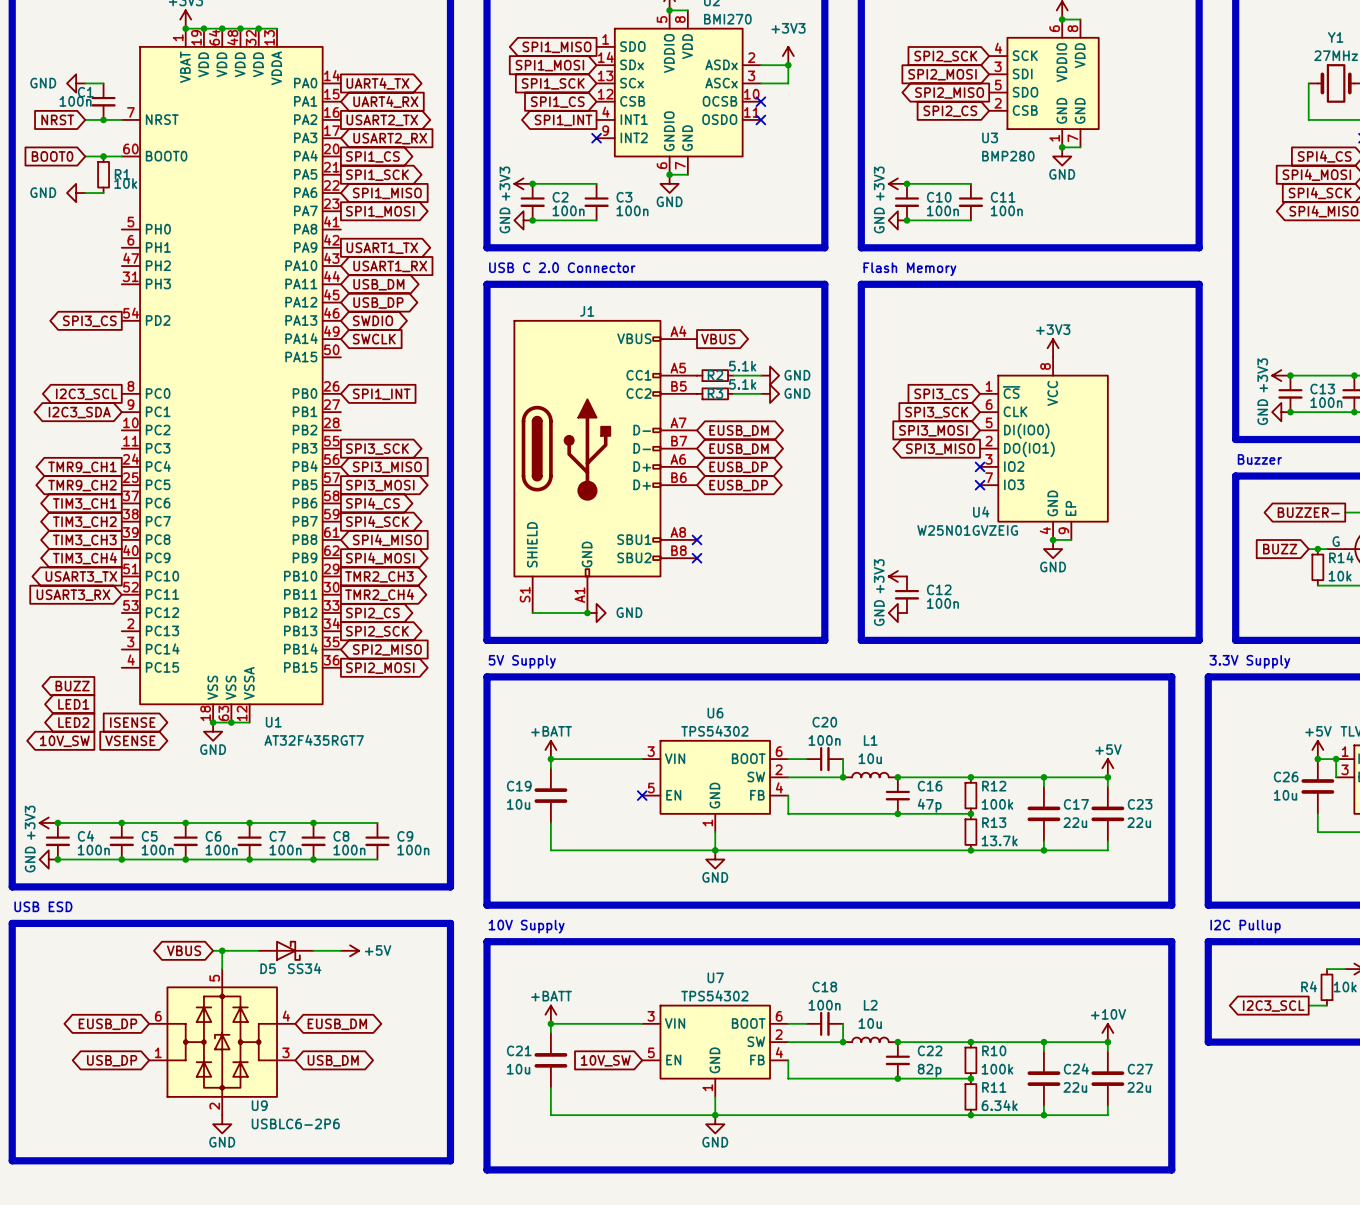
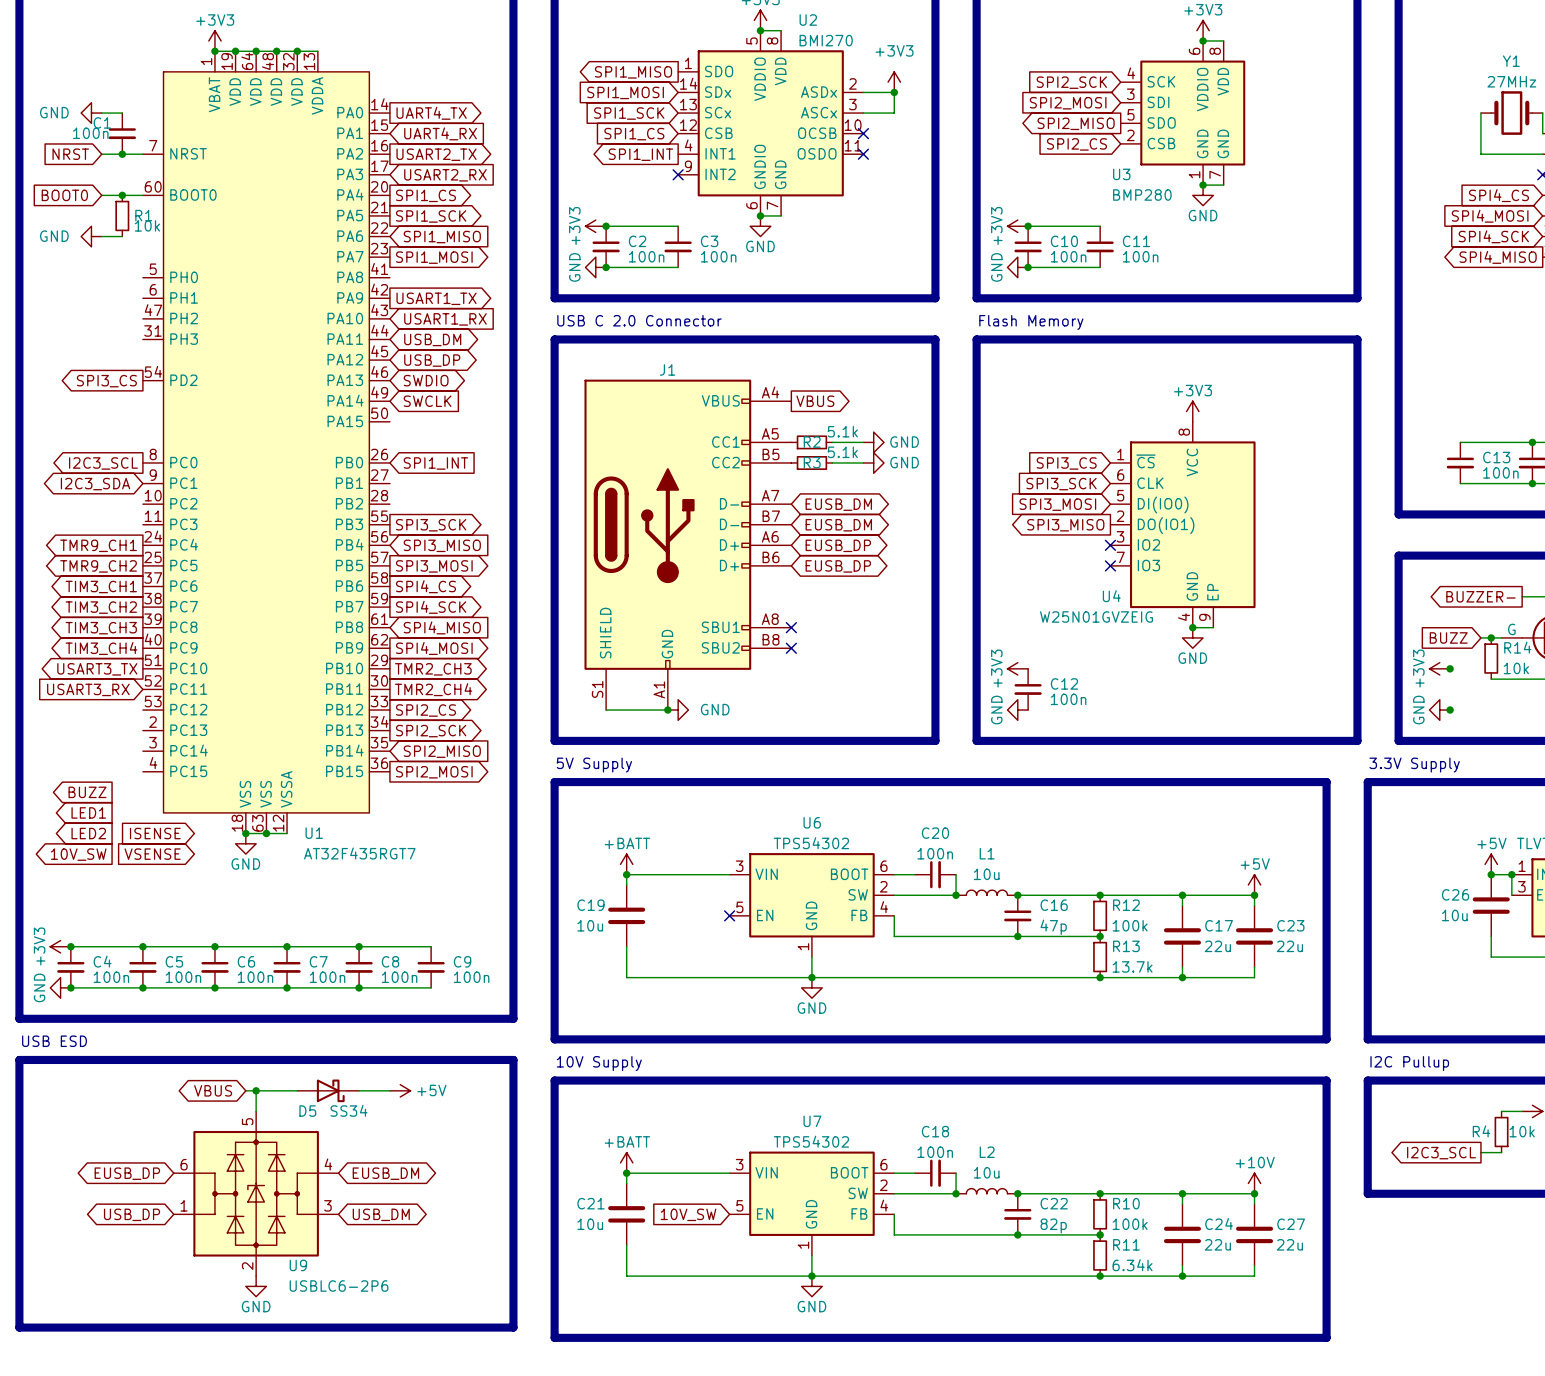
power symbol: +3V3 (1281, 375) -> none
junction: (1290, 375) -> none
power symbol: GND (1281, 412) -> none
junction: (1290, 412) -> none
text: Buzzer (1259, 459) -> none
power symbol: none -> +3V3 (1439, 668)
junction: none -> (1450, 668)
power symbol: none -> GND (1439, 710)
junction: none -> (1450, 710)

